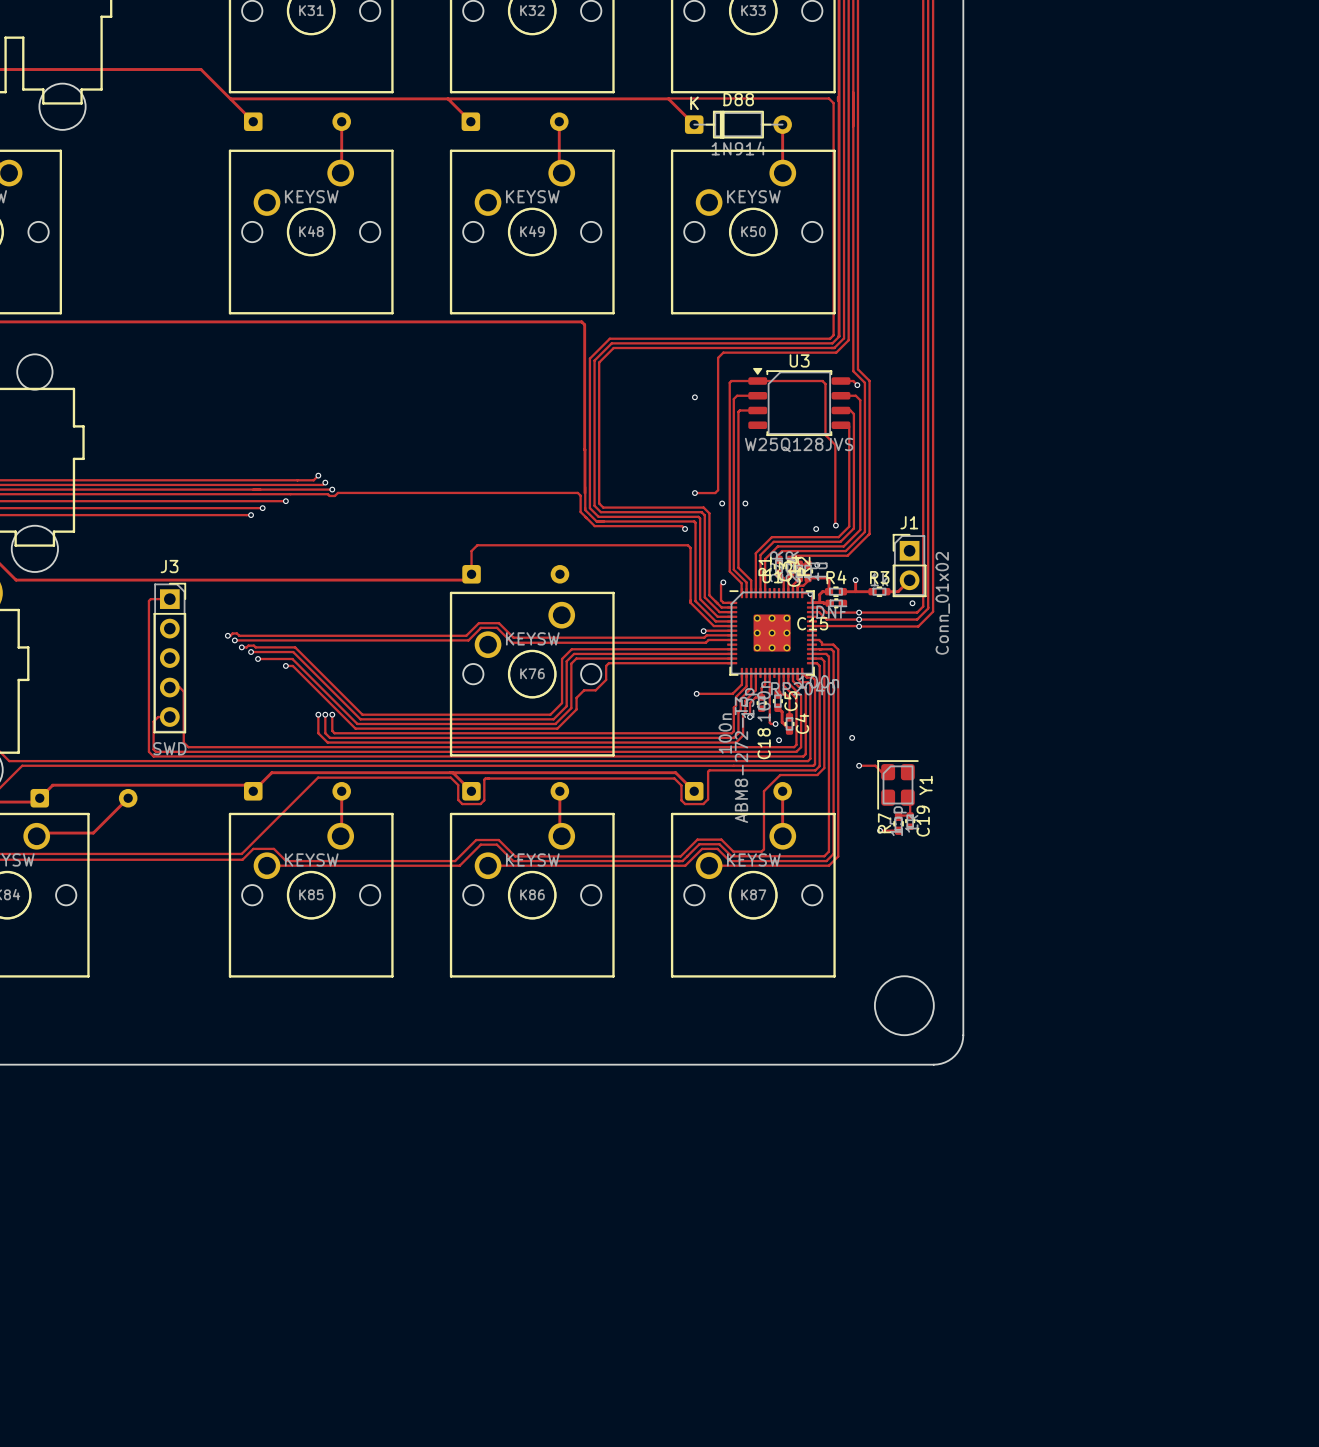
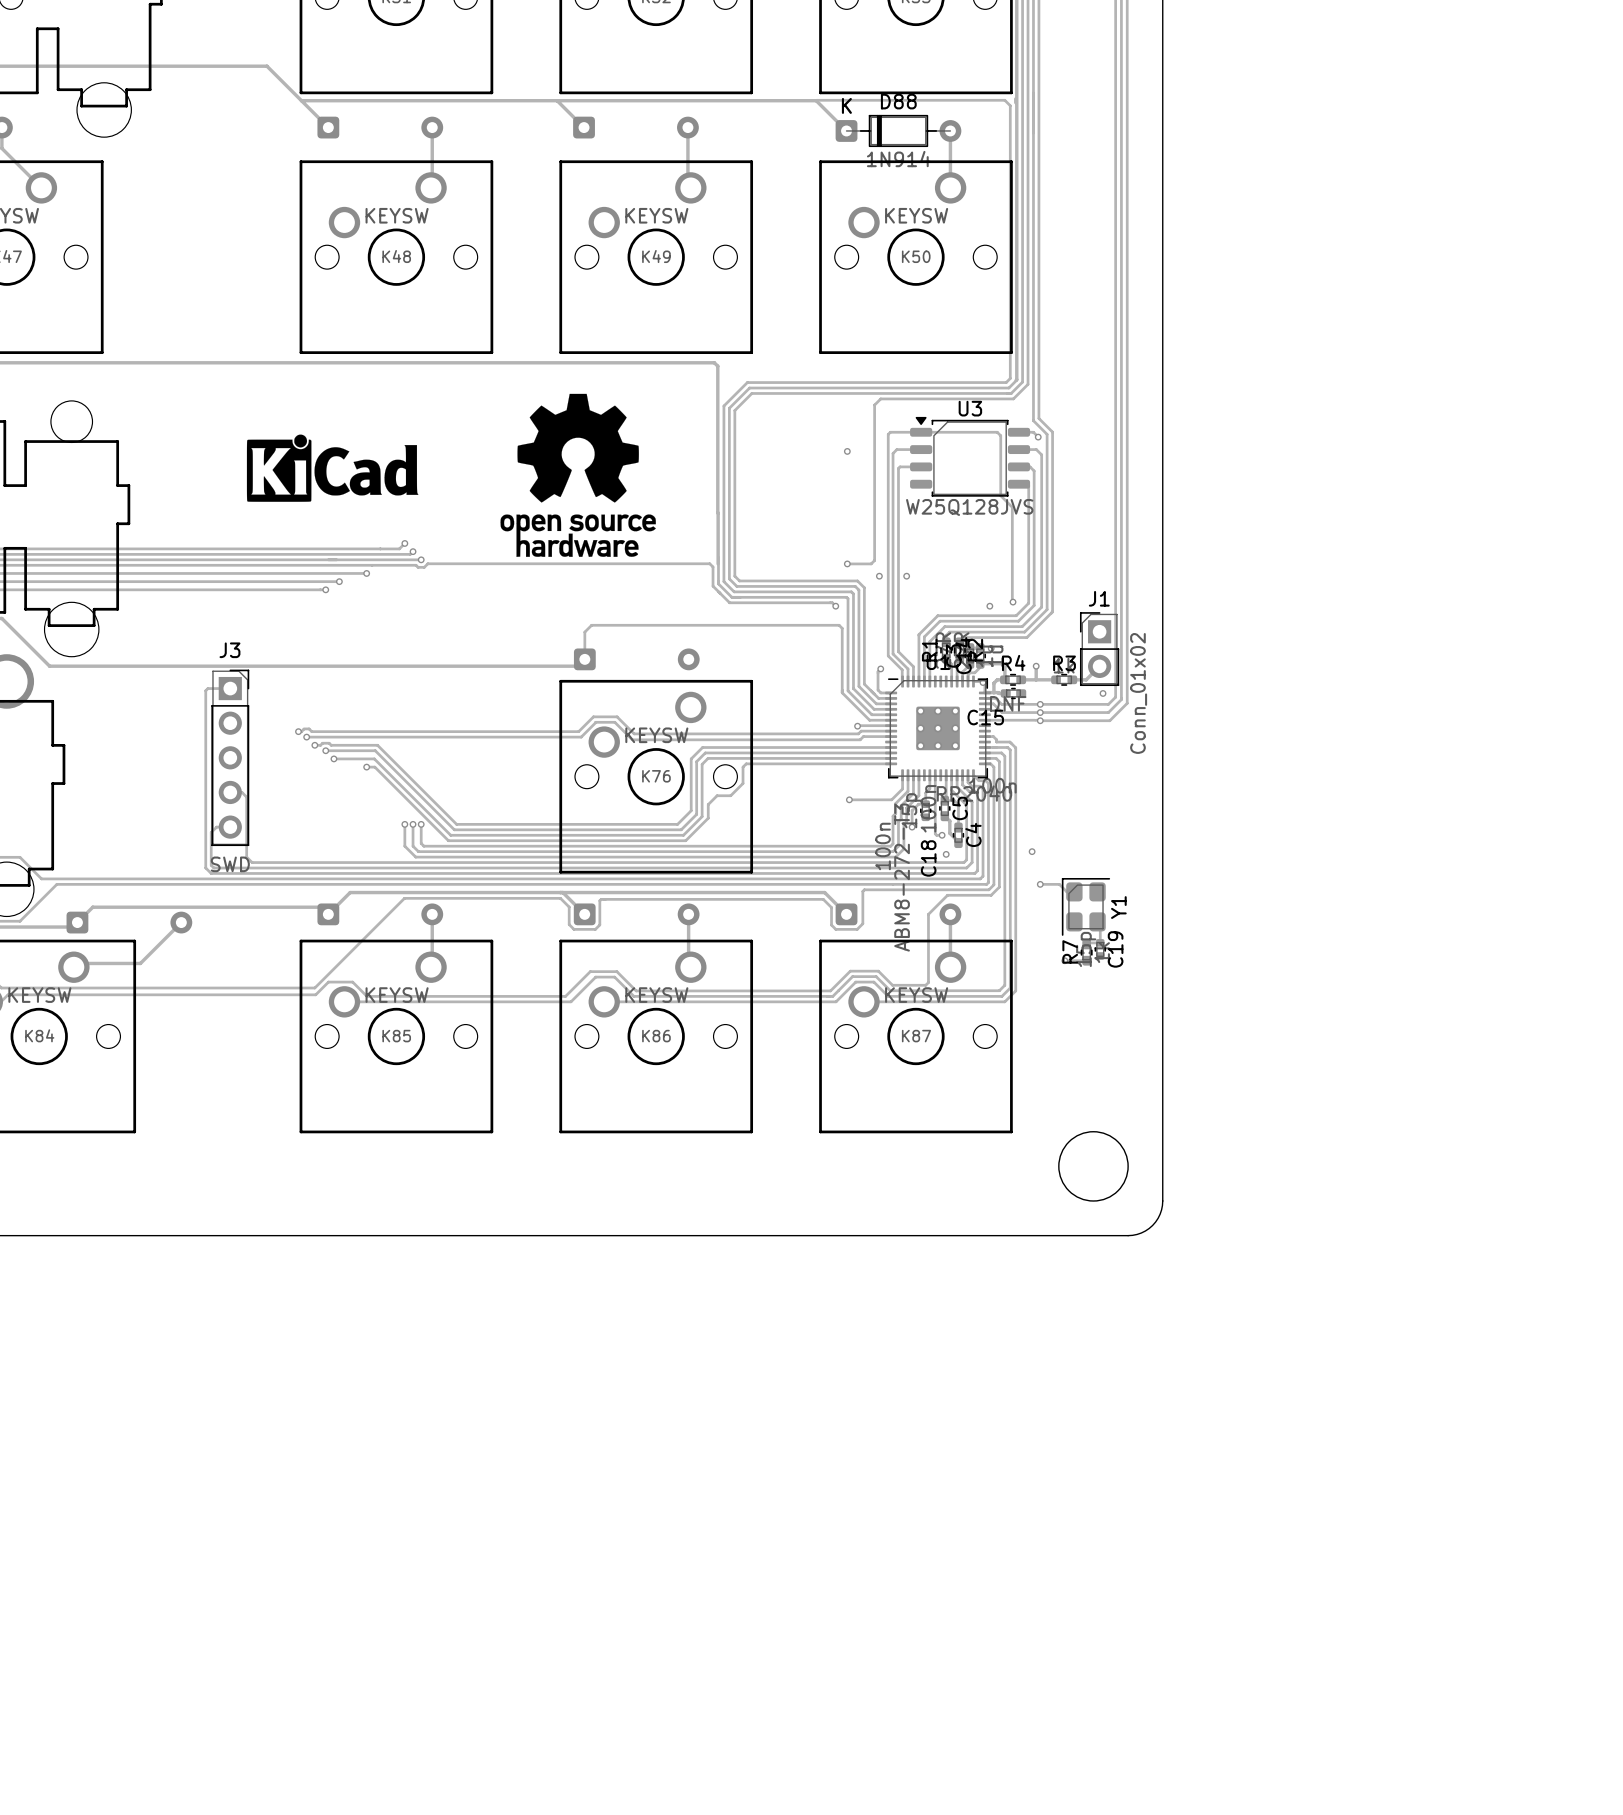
drawing: none -> [500, 393, 656, 557]
drawing: none -> [246, 434, 419, 502]

